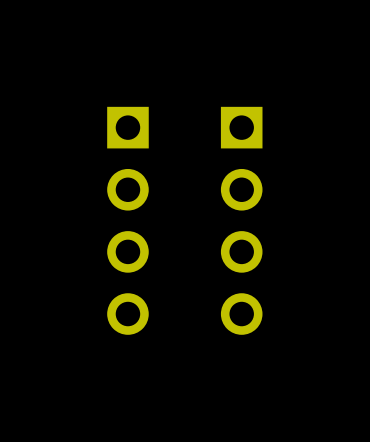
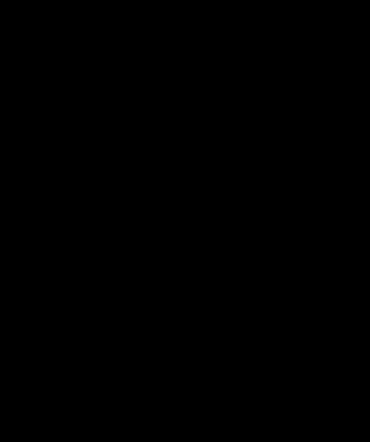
part: (127, 220) -> none
part: (241, 220) -> none

